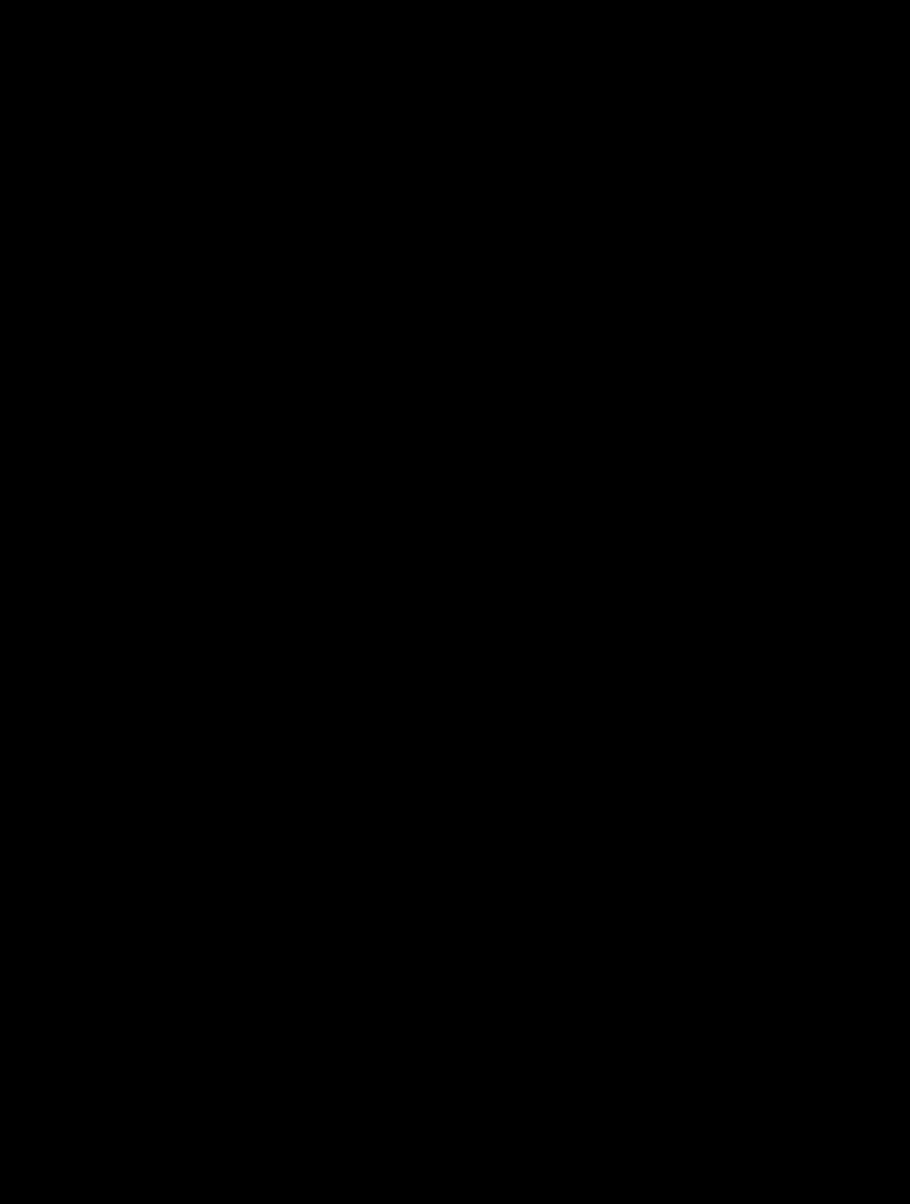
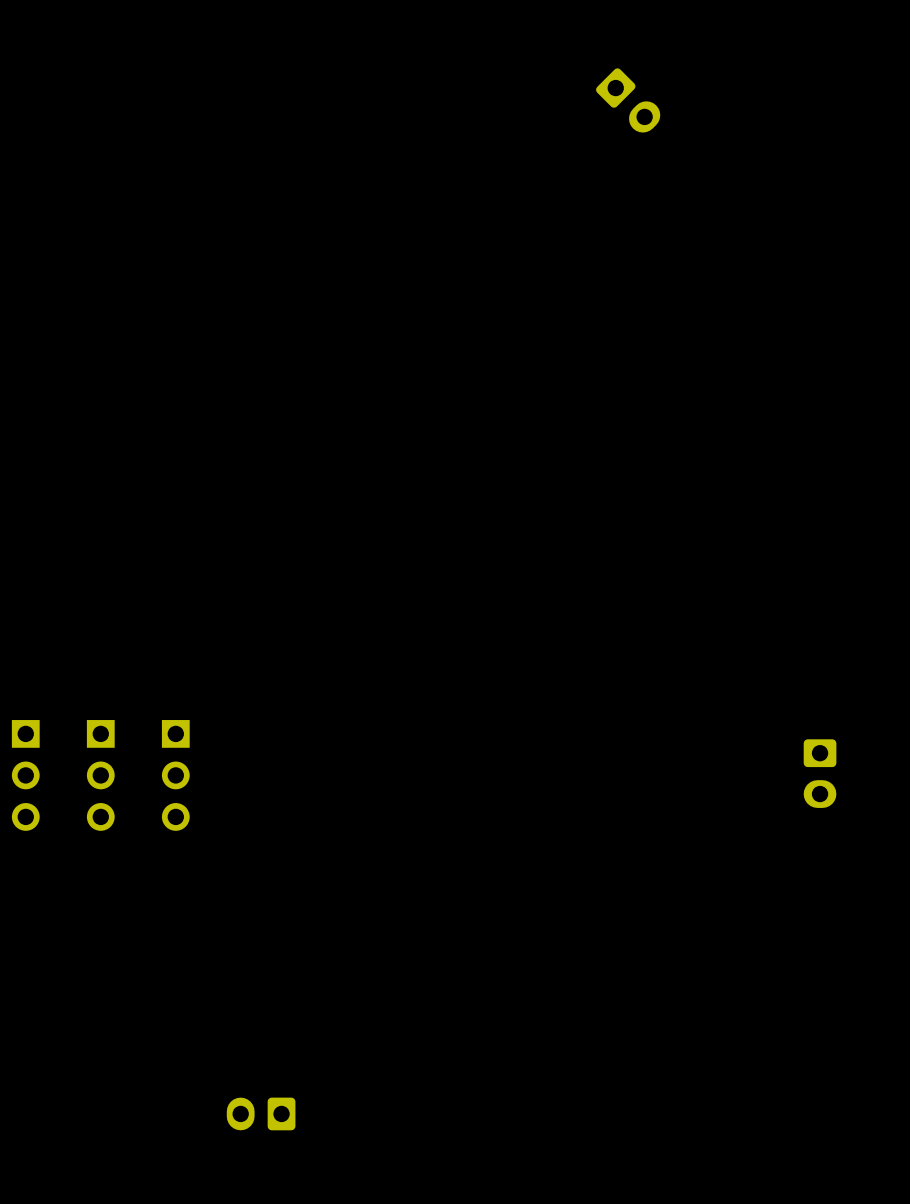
part: none -> (628, 100)
part: none -> (820, 773)
part: none -> (25, 775)
part: none -> (100, 775)
part: none -> (175, 775)
part: none -> (261, 1113)

